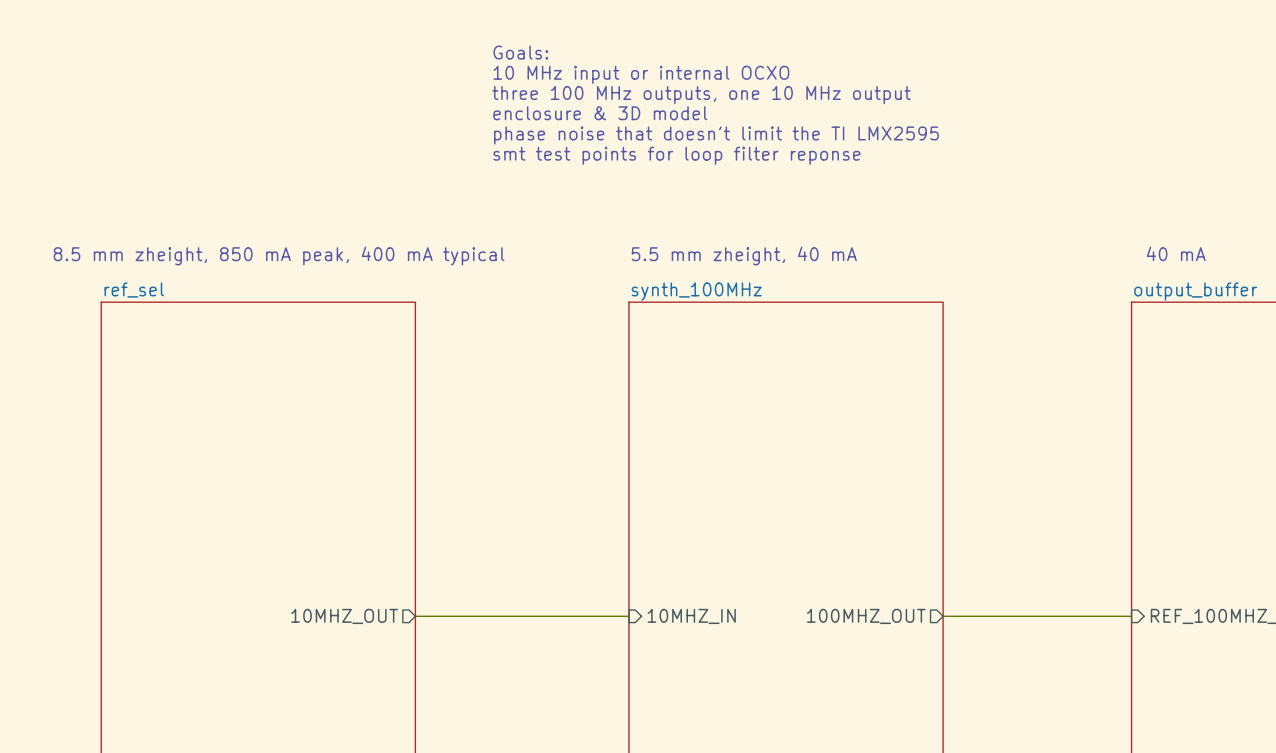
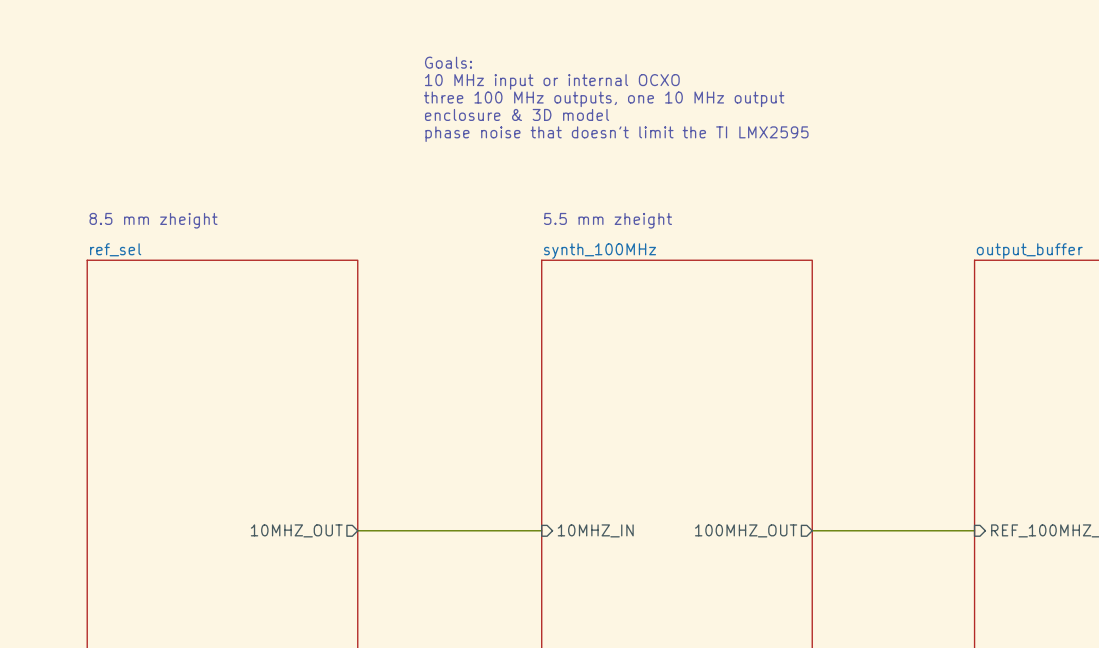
text: Goals: (520, 52) -> none
text: 10 MHz input or internal OCXO (641, 74) -> Goals: (448, 62)
text: three 100 MHz outputs, one 10 MHz output (701, 95) -> 10 MHz input or internal OCXO (552, 81)
text: enclosure & 3D model (600, 113) -> three 100 MHz outputs, one 10 MHz output (604, 99)
text: phase noise that doesn't limit the TI LMX2595 (716, 135) -> enclosure & 3D model (517, 114)
text: smt test points for loop filter reponse (676, 155) -> phase noise that doesn't limit the TI LMX2595 (617, 134)
text: 40 mA (1176, 253) -> none
text: 8.5 mm zheight, 850 mA peak, 400 mA typical (279, 255) -> none
text: 5.5 mm zheight, 40 mA (744, 255) -> 5.5 mm zheight (608, 220)
text: none -> 8.5 mm zheight (153, 220)

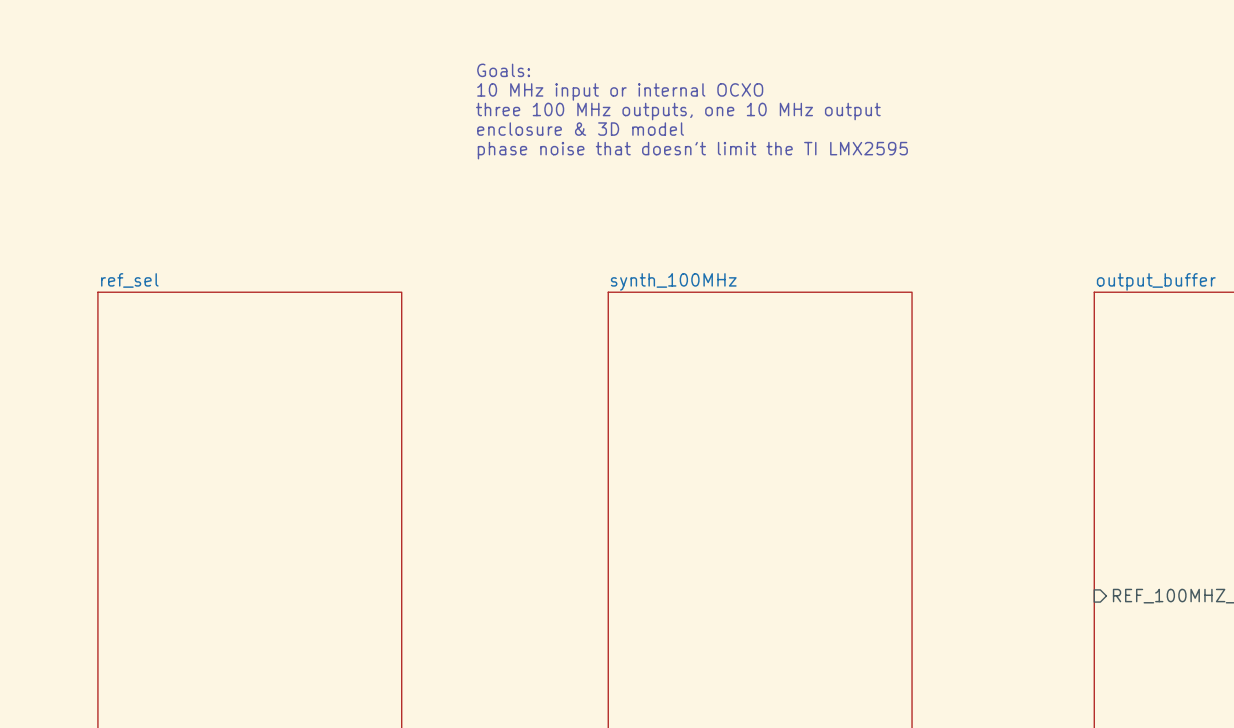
text: 8.5 mm zheight (153, 220) -> none
text: 5.5 mm zheight (608, 220) -> none
sheet pin: 10MHZ_OUT (296, 530) -> none
wire: (357, 530) (541, 530) -> none
sheet pin: 10MHZ_IN (595, 530) -> none
sheet pin: 100MHZ_OUT (746, 530) -> none
wire: (812, 530) (974, 530) -> none

